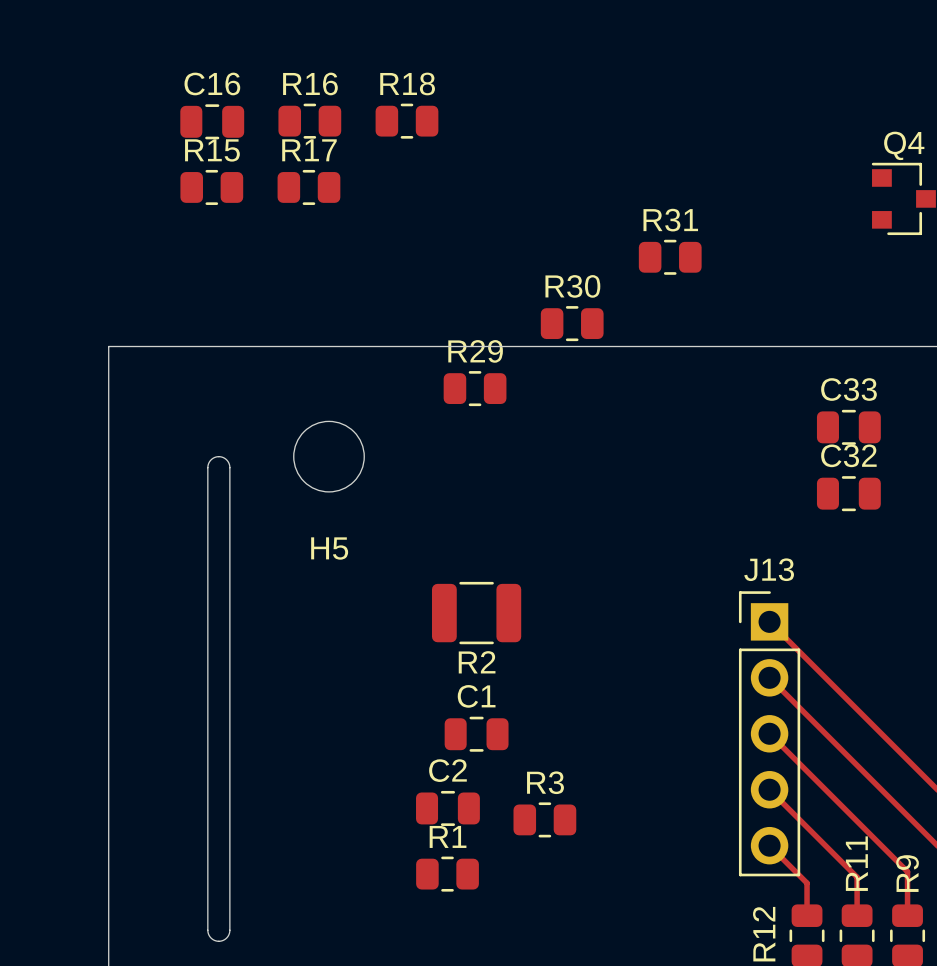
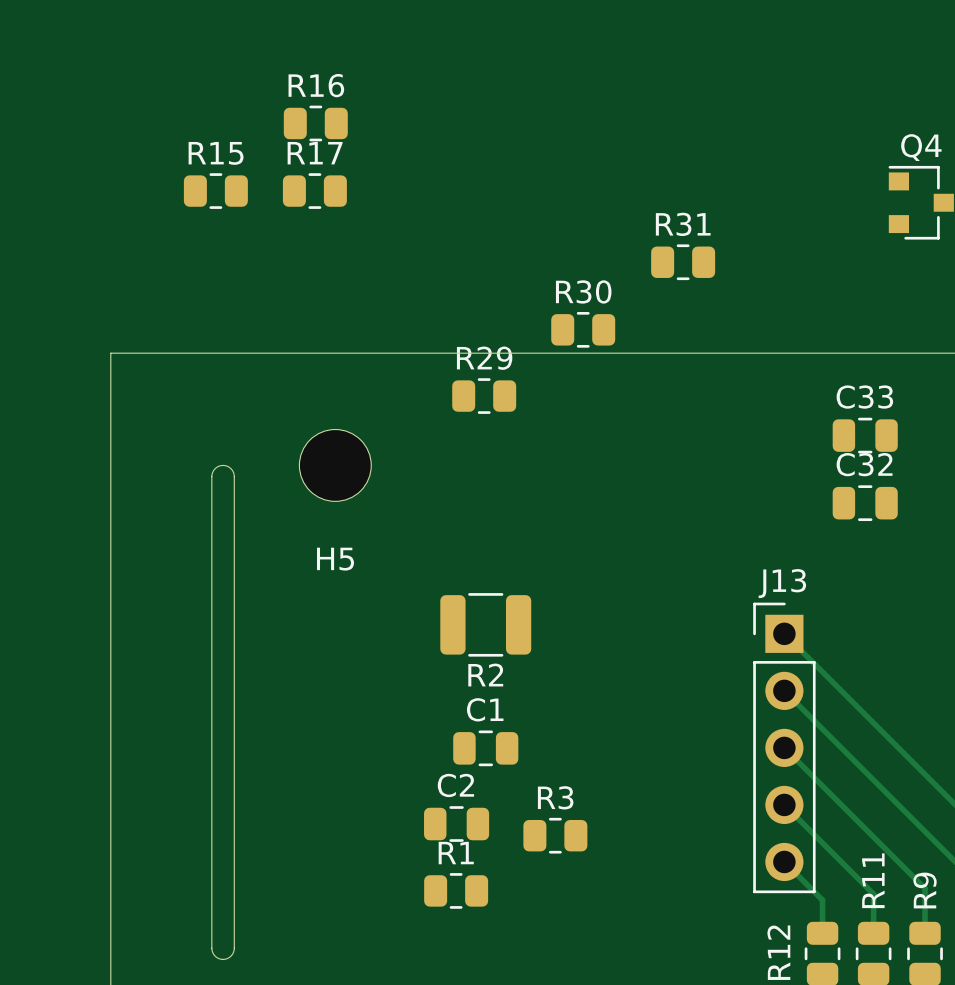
C16: (212, 121) -> none
R18: (406, 121) -> none

